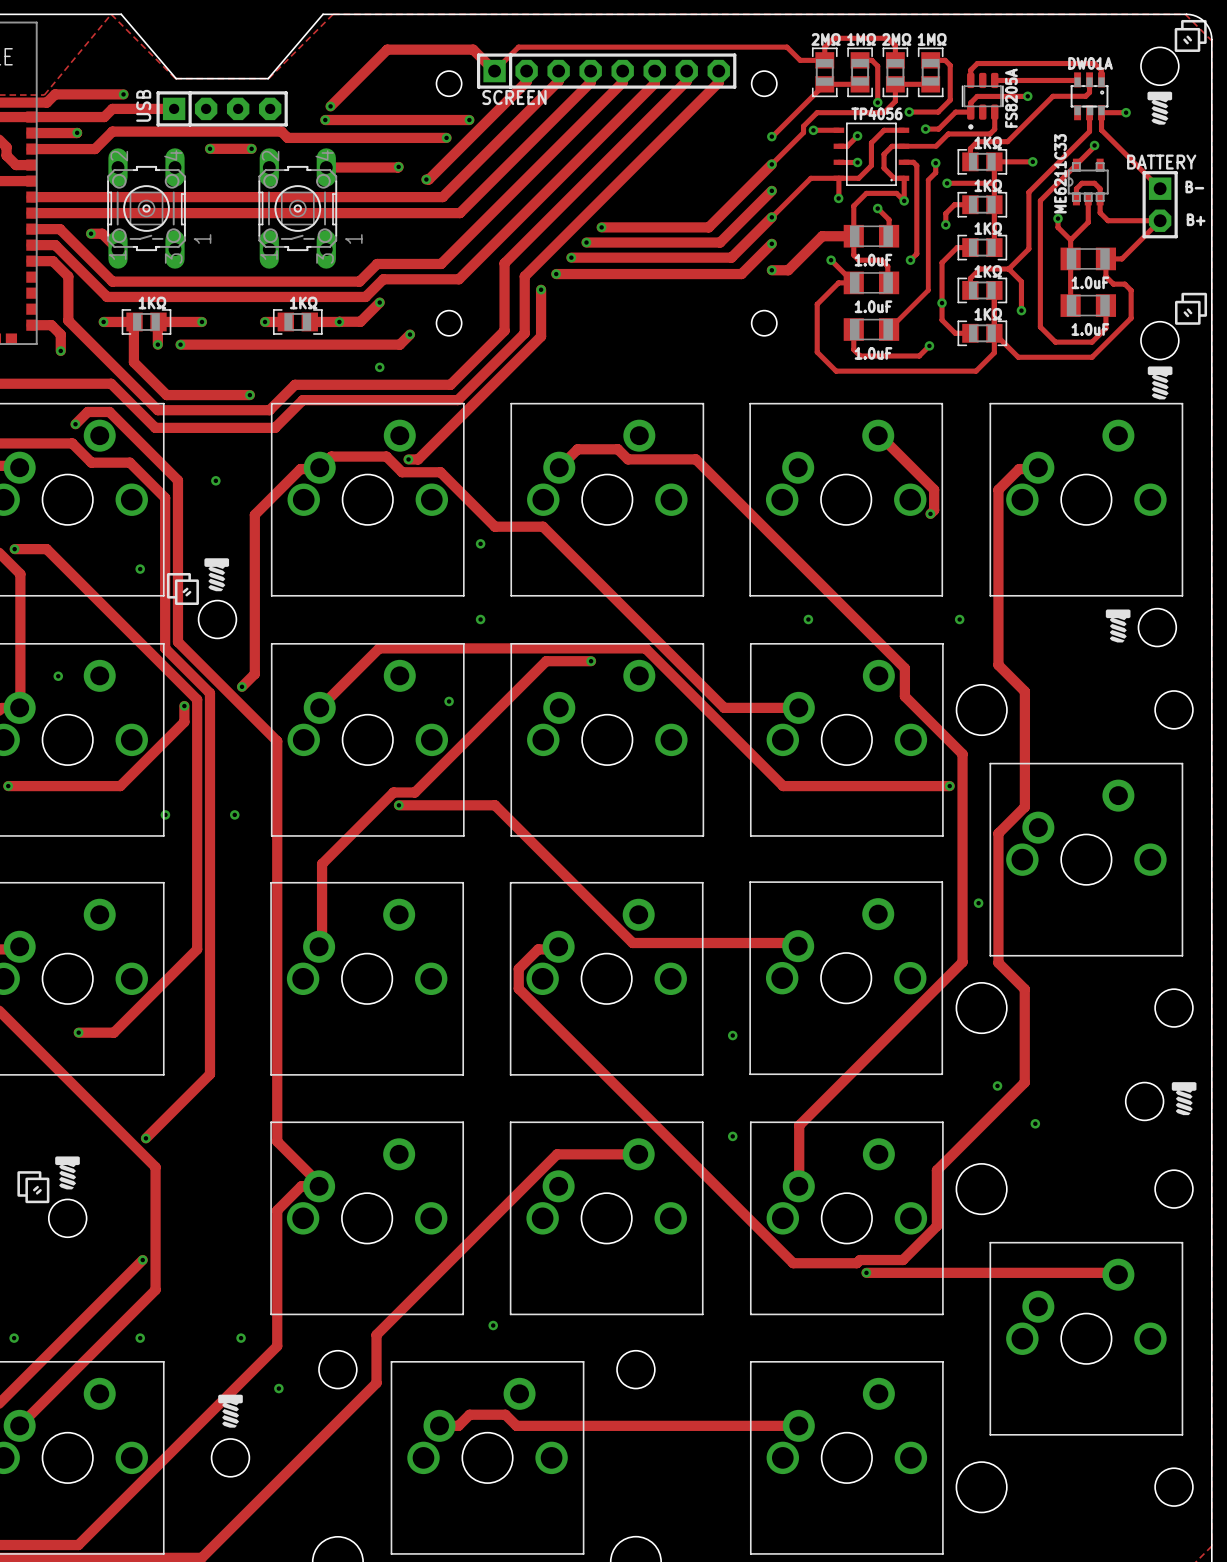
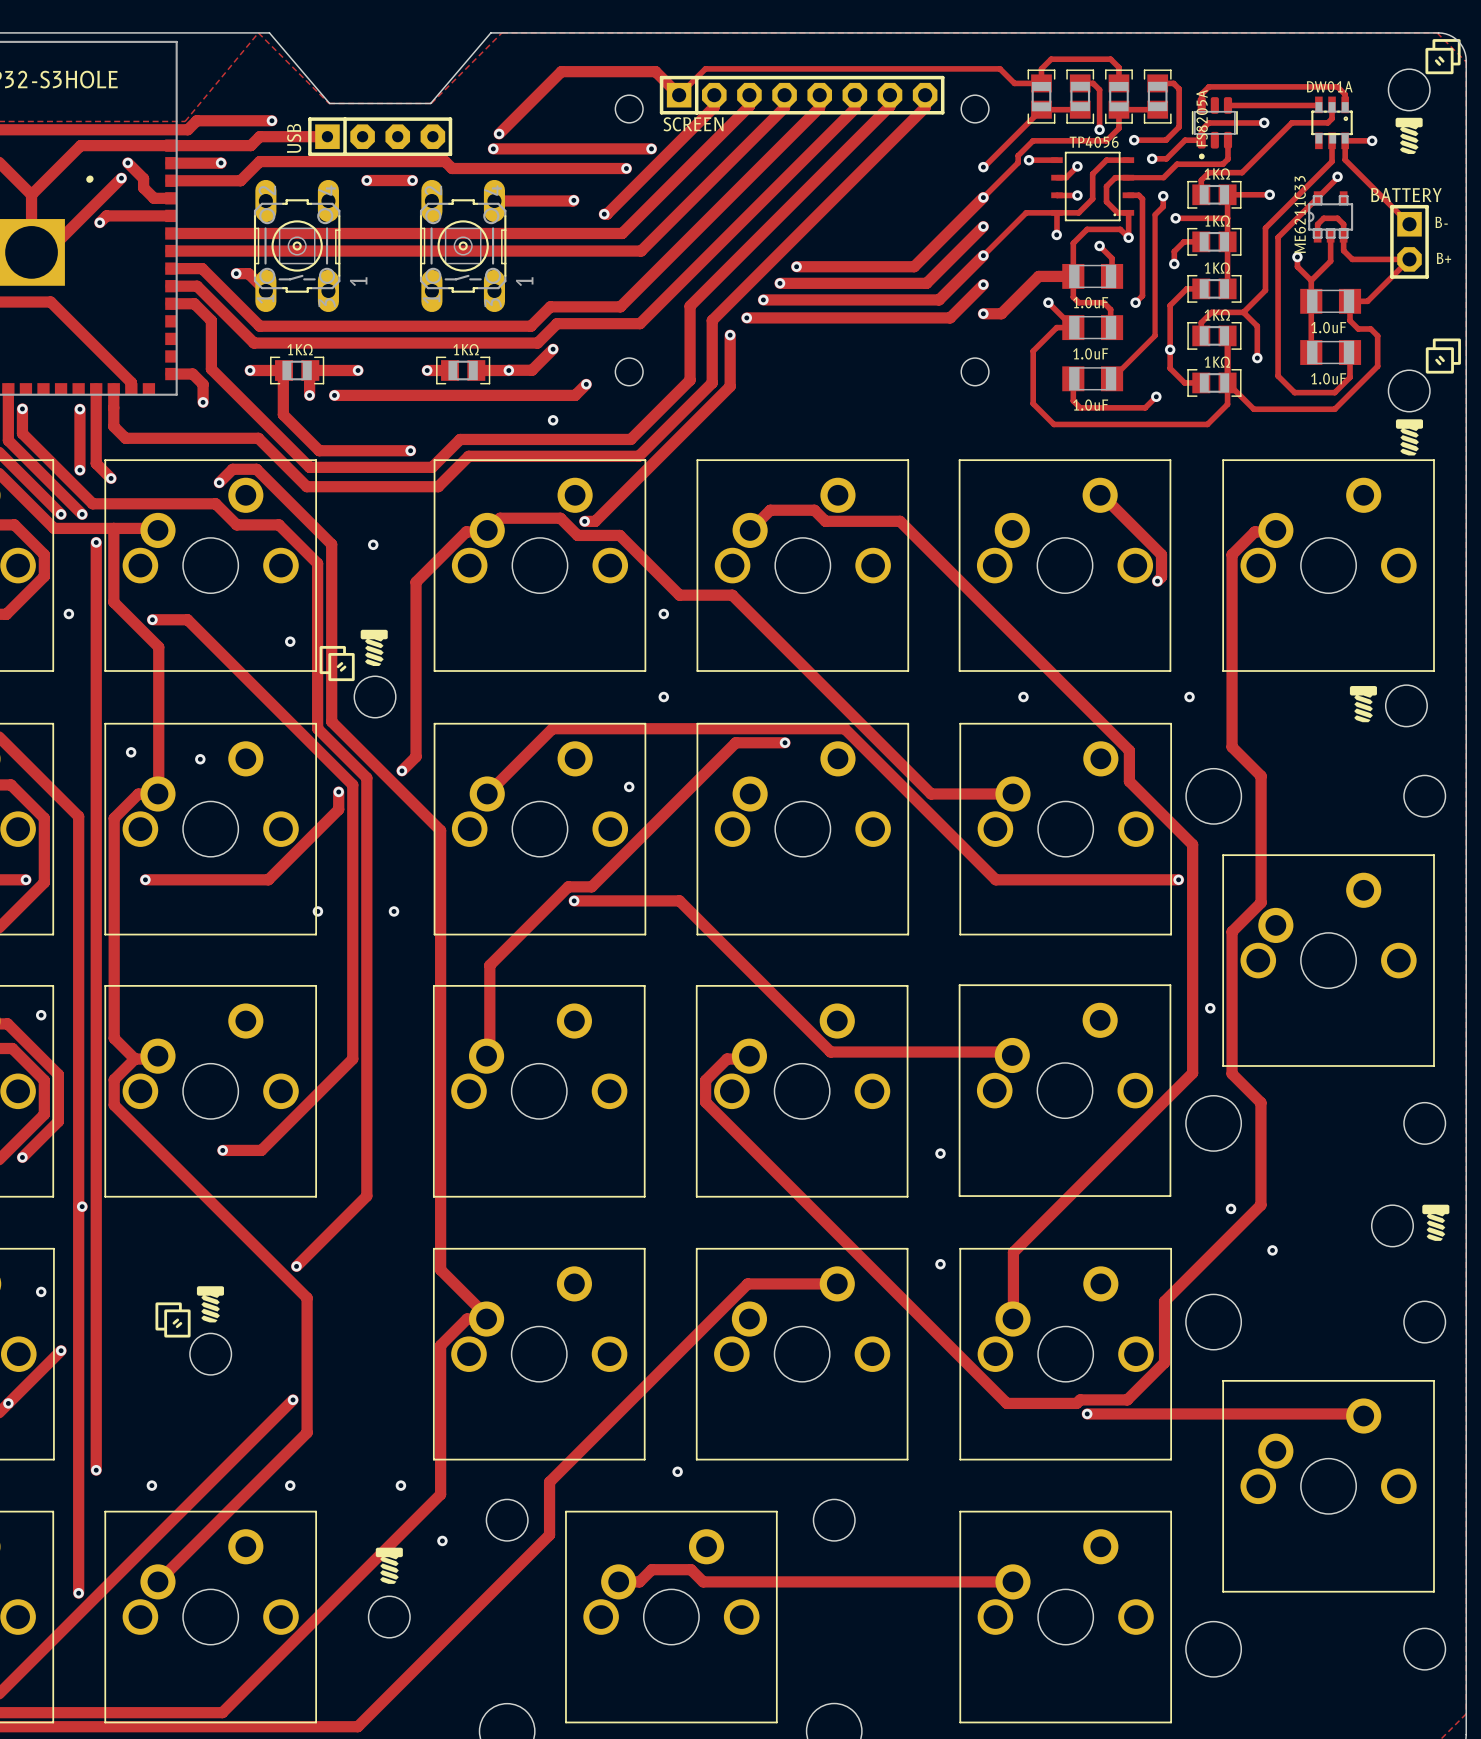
text: 2MΩ (826, 39) -> none
text: 1MΩ (861, 39) -> none
text: 2MΩ (896, 39) -> none
text: 1MΩ (932, 39) -> none
text position: FS8205A (1011, 98) -> FS8205A (1202, 118)

